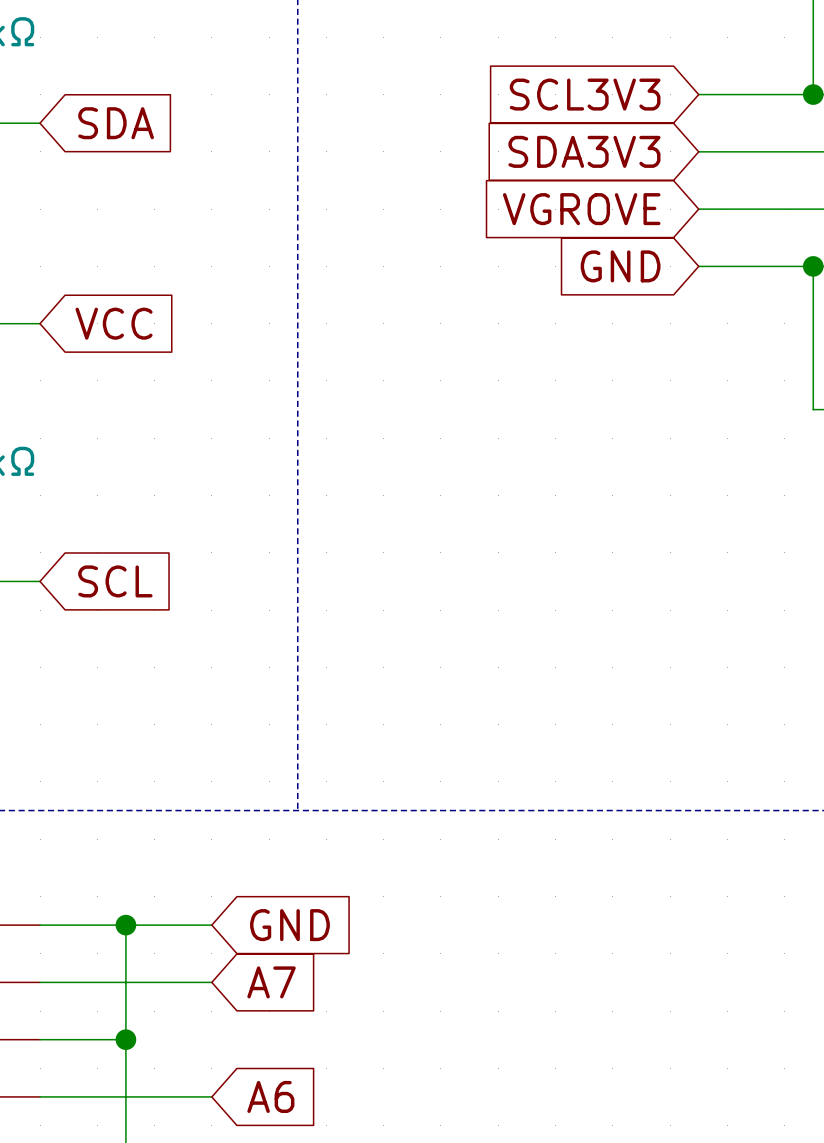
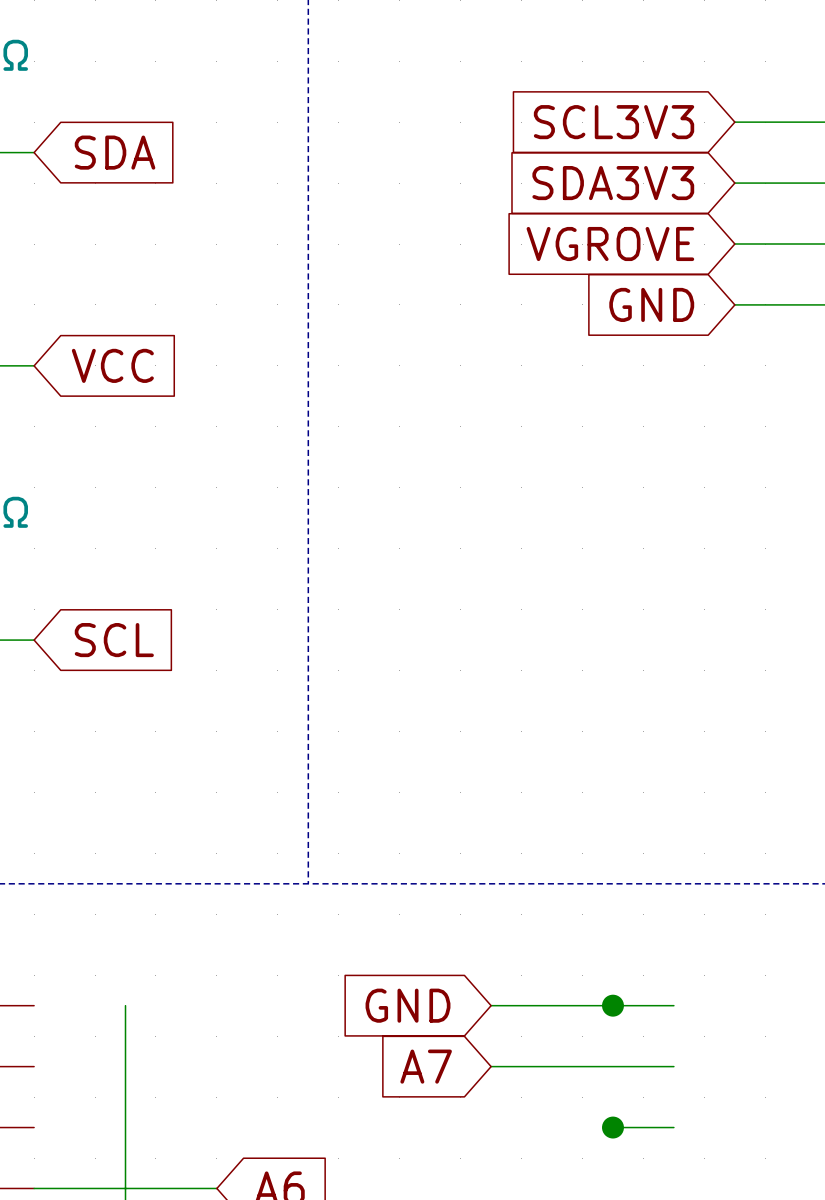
wire: (40, 925) (211, 925) -> (491, 1005) (673, 1005)
junction: (125, 925) -> none
global label rotation: 0° (289, 925) -> 180° (408, 1005)
junction: none -> (612, 1005)
wire: (40, 982) (211, 982) -> (491, 1066) (673, 1066)
global label rotation: 0° (271, 982) -> 180° (426, 1066)
wire: (40, 1039) (125, 1039) -> none
junction: (125, 1039) -> none
wire: none -> (612, 1127) (673, 1127)
junction: none -> (612, 1127)

